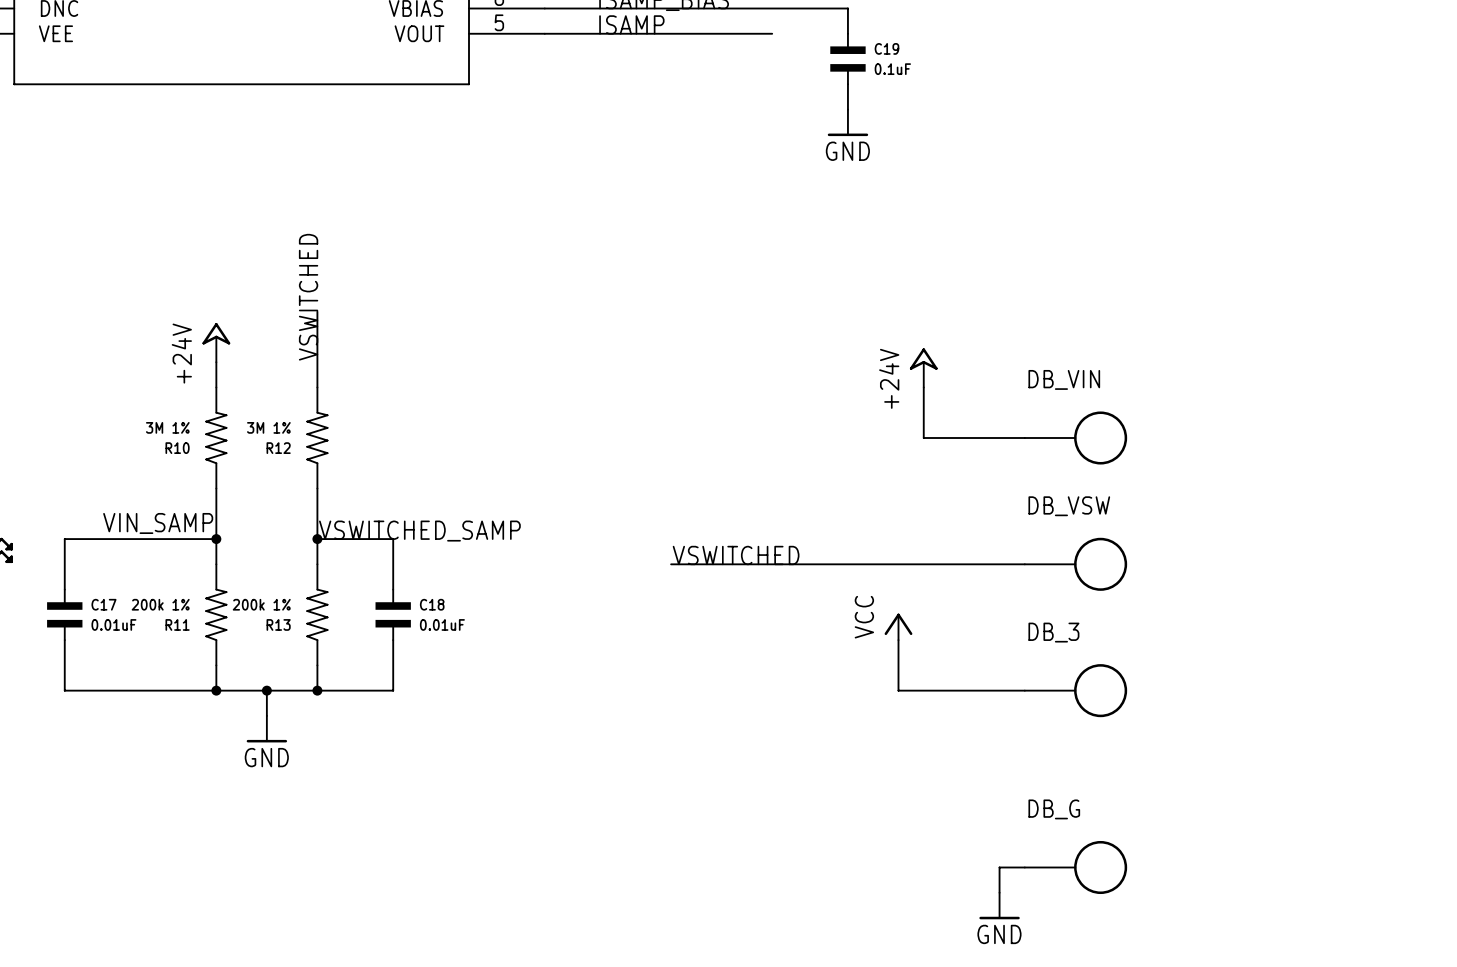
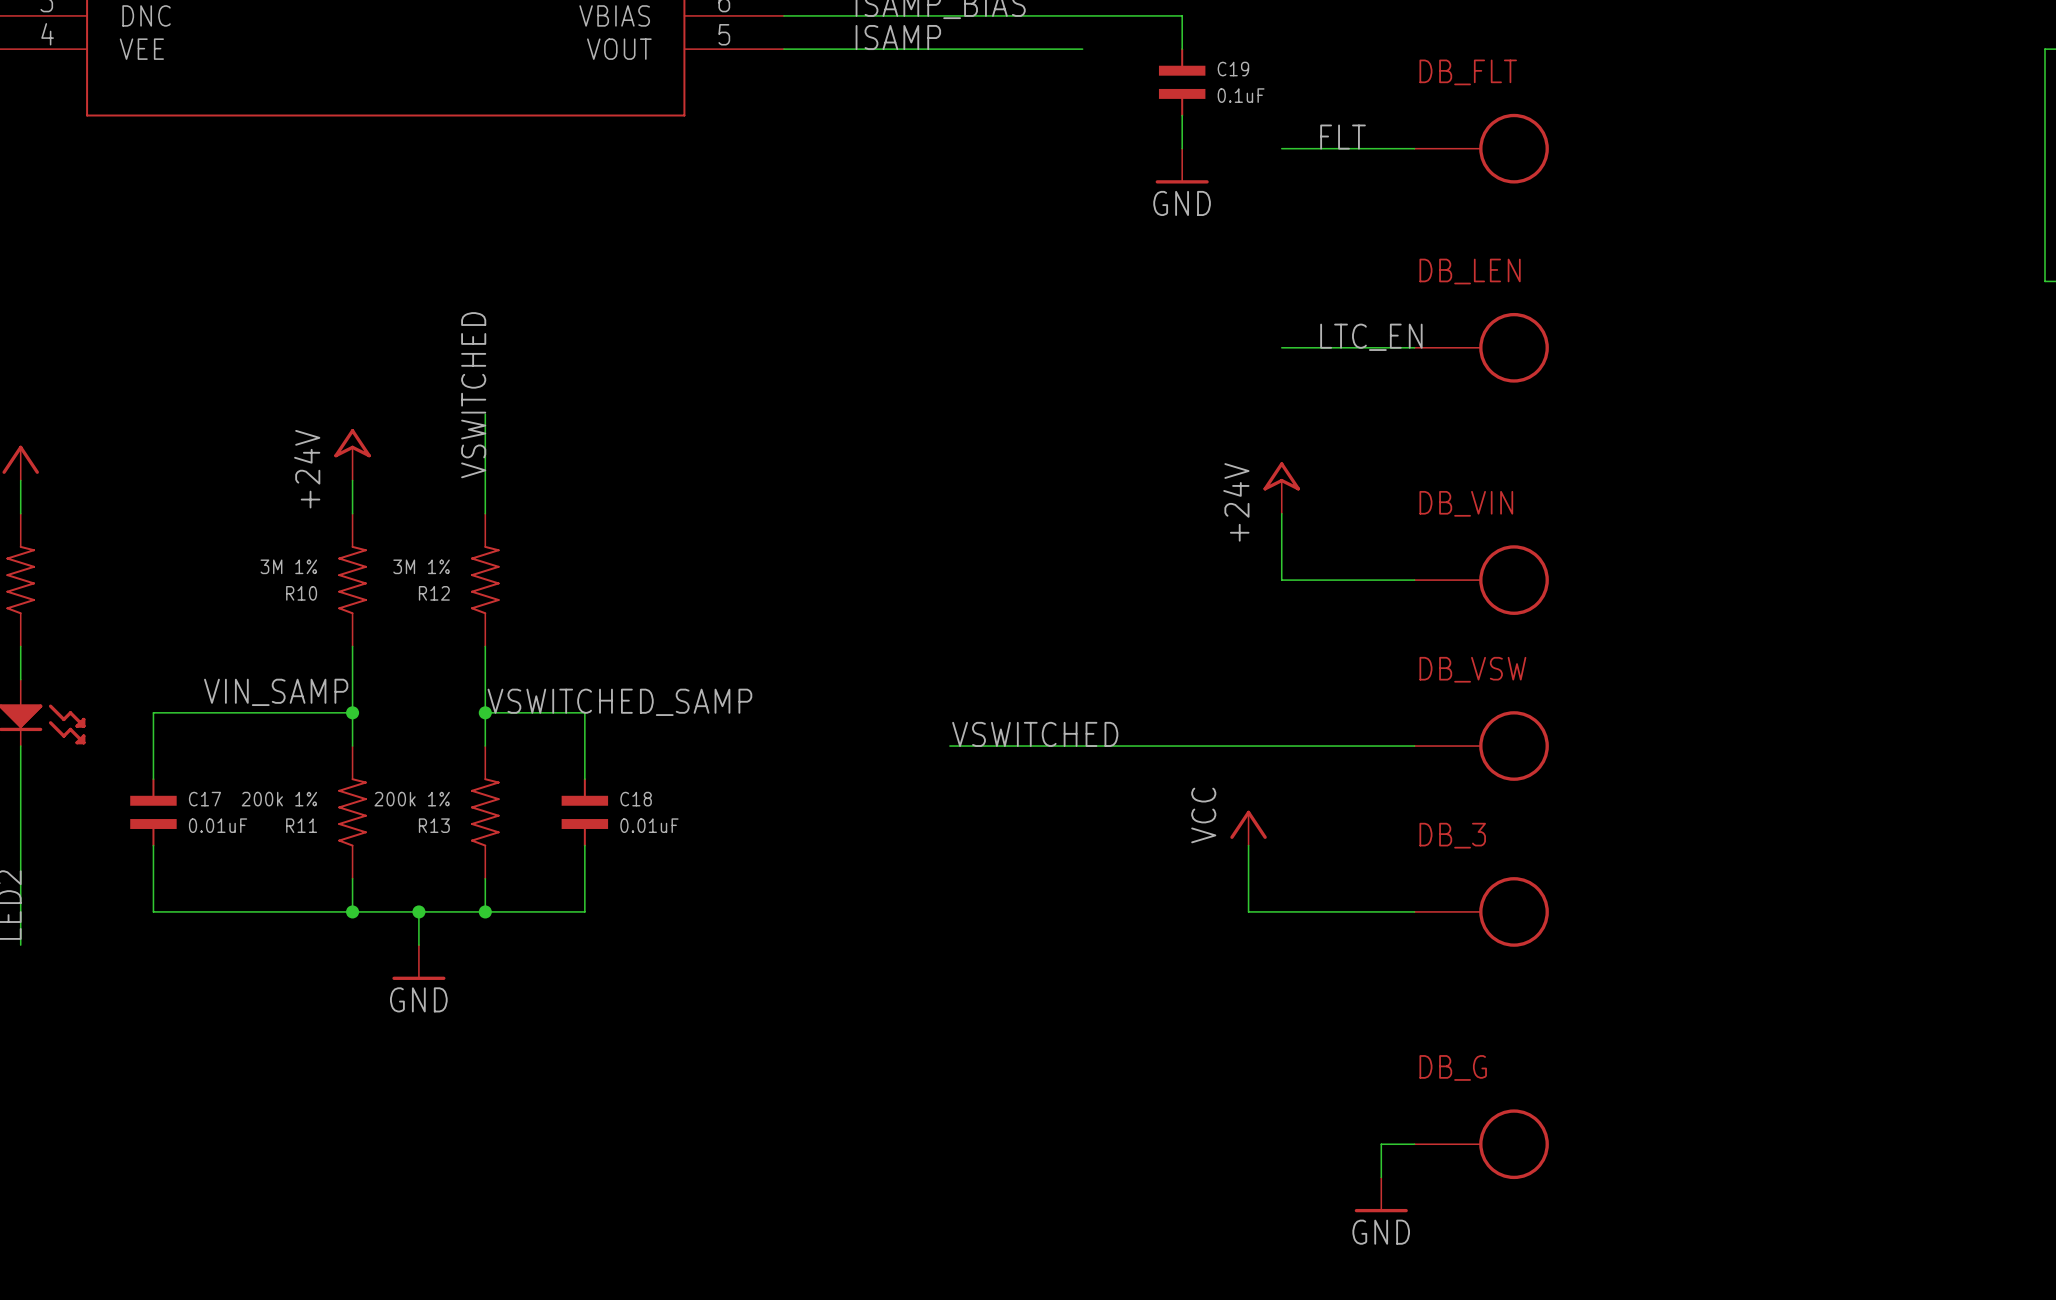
label: none -> FLT (1343, 137)
wire: none -> (1281, 148) (1414, 148)
DB_FLT: none -> (1481, 148)
label: none -> LTC_EN (1371, 337)
wire: none -> (1281, 347) (1414, 347)
DB_LEN: none -> (1481, 347)

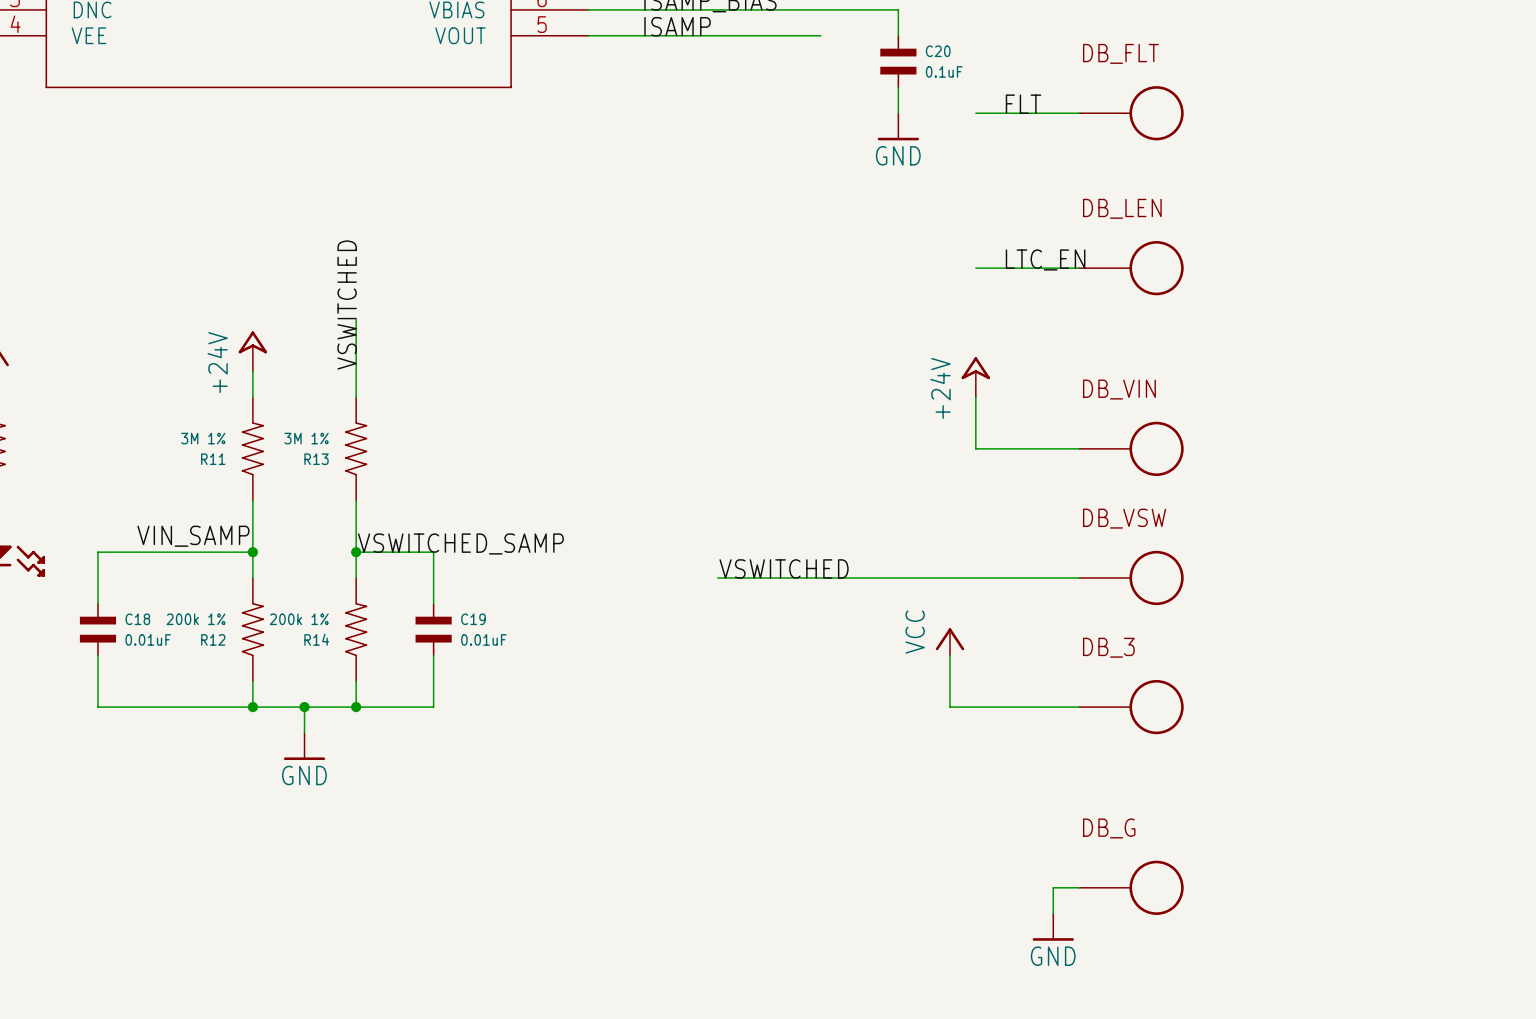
C19 name: C19 (1233, 69) -> C20 (938, 51)
R10 name: R10 (301, 593) -> R11 (213, 459)
R12 name: R12 (434, 593) -> R13 (316, 459)
C17 name: C17 (204, 799) -> C18 (137, 619)
C18 name: C18 (636, 799) -> C19 (473, 619)
R11 name: R11 (301, 825) -> R12 (213, 639)
R13 name: R13 (434, 825) -> R14 (316, 639)

